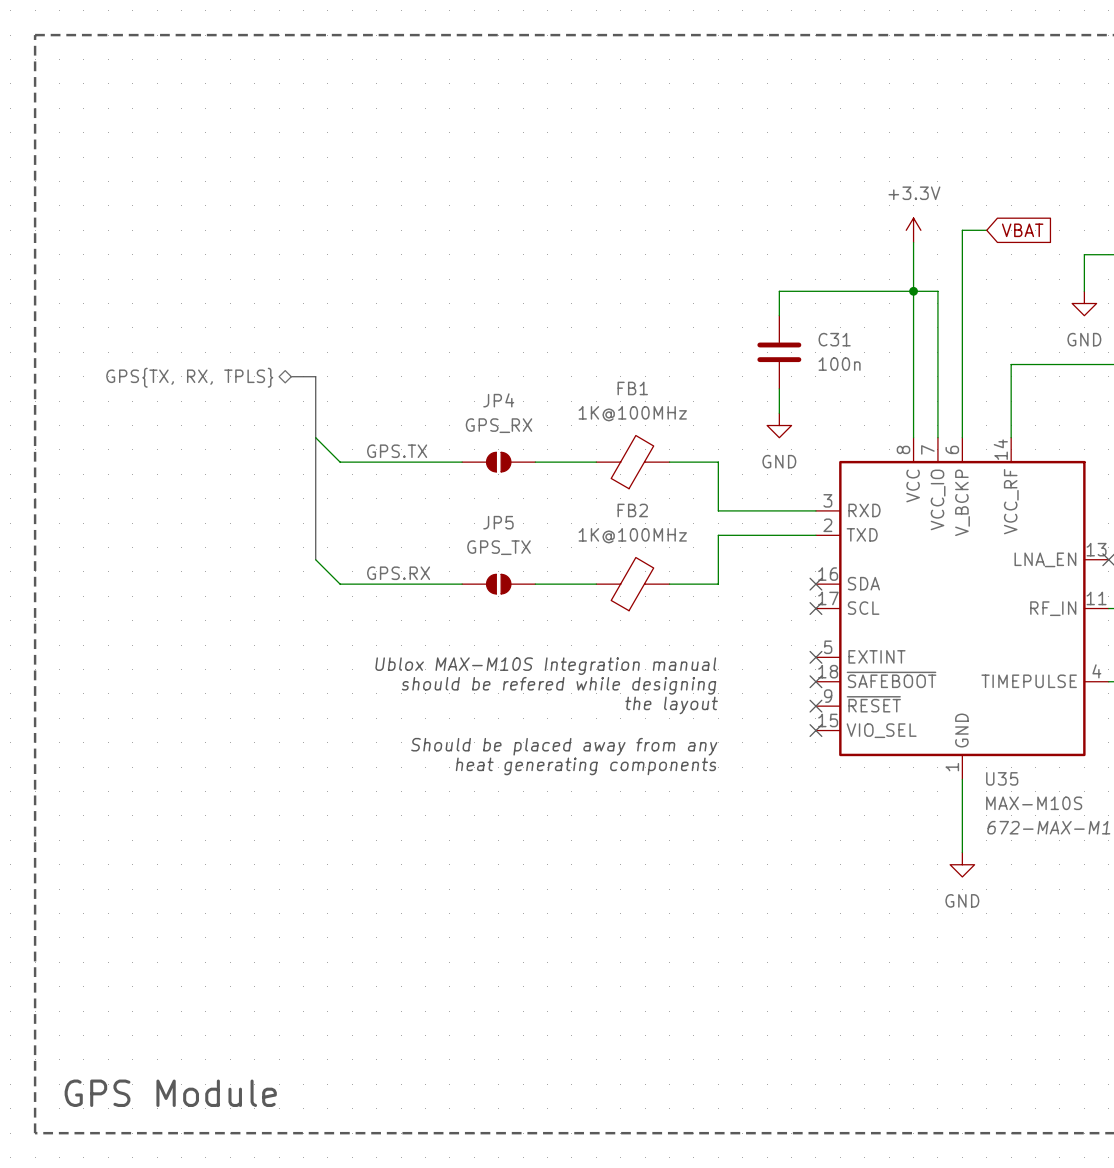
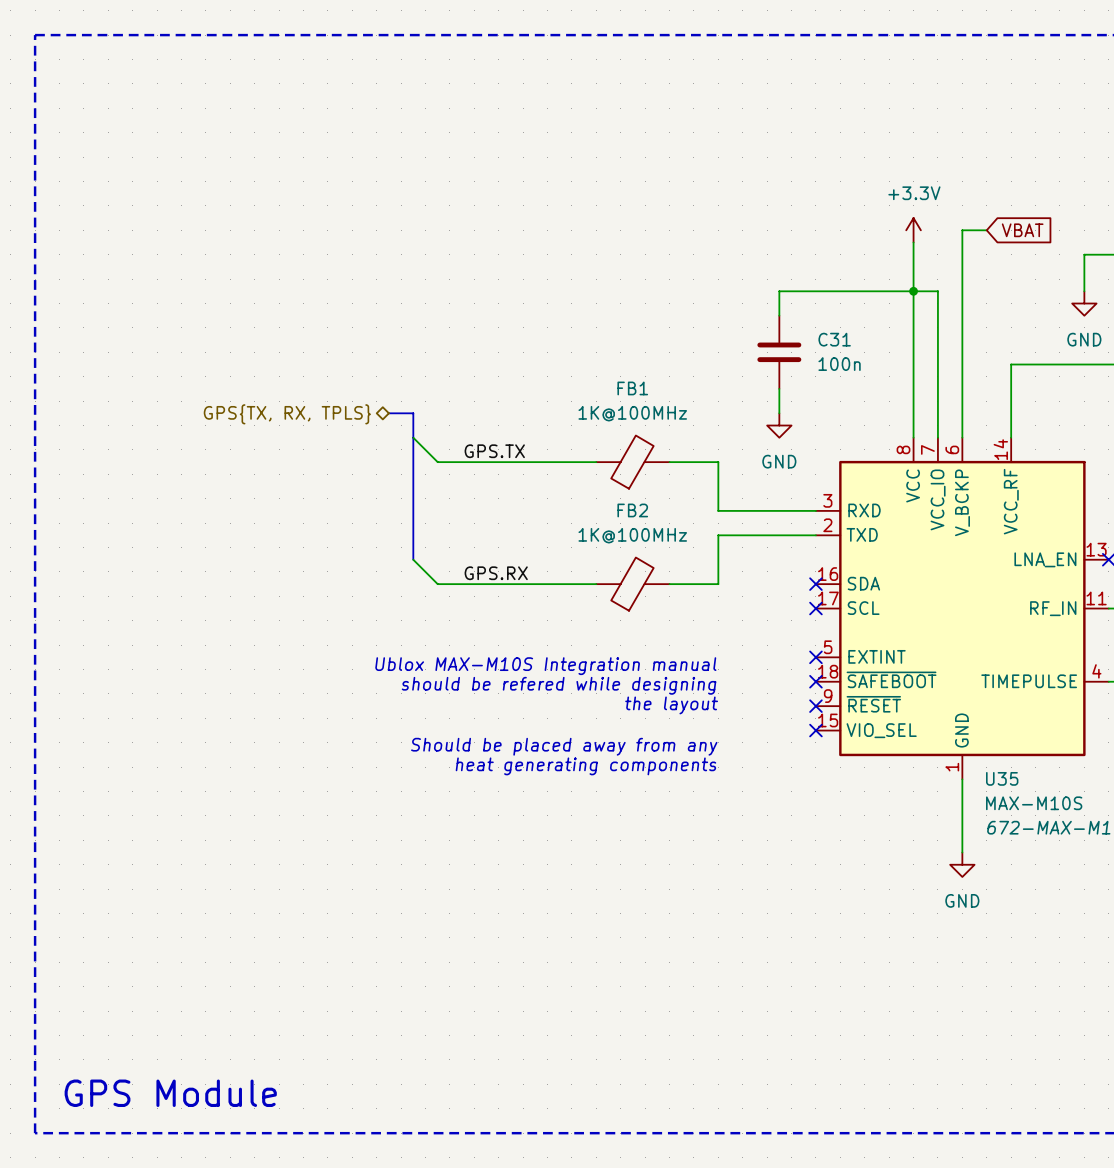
bus: (291, 376) (315, 376) (315, 559) -> none
hierarchical label position: GPS{TX, RX, TPLS} (189, 377) -> GPS{TX, RX, TPLS} (287, 414)
bus: none -> (388, 413) (413, 413) (413, 559)
wire: (315, 437) (340, 462) (437, 462) -> (413, 437) (437, 462)
label position: GPS.TX (397, 451) -> GPS.TX (494, 451)
JP4: GPS_RX (498, 462) -> none
wire: (315, 559) (340, 584) (437, 584) -> (413, 559) (437, 584)
label position: GPS.RX (398, 573) -> GPS.RX (496, 573)
JP5: GPS_TX (498, 584) -> none

